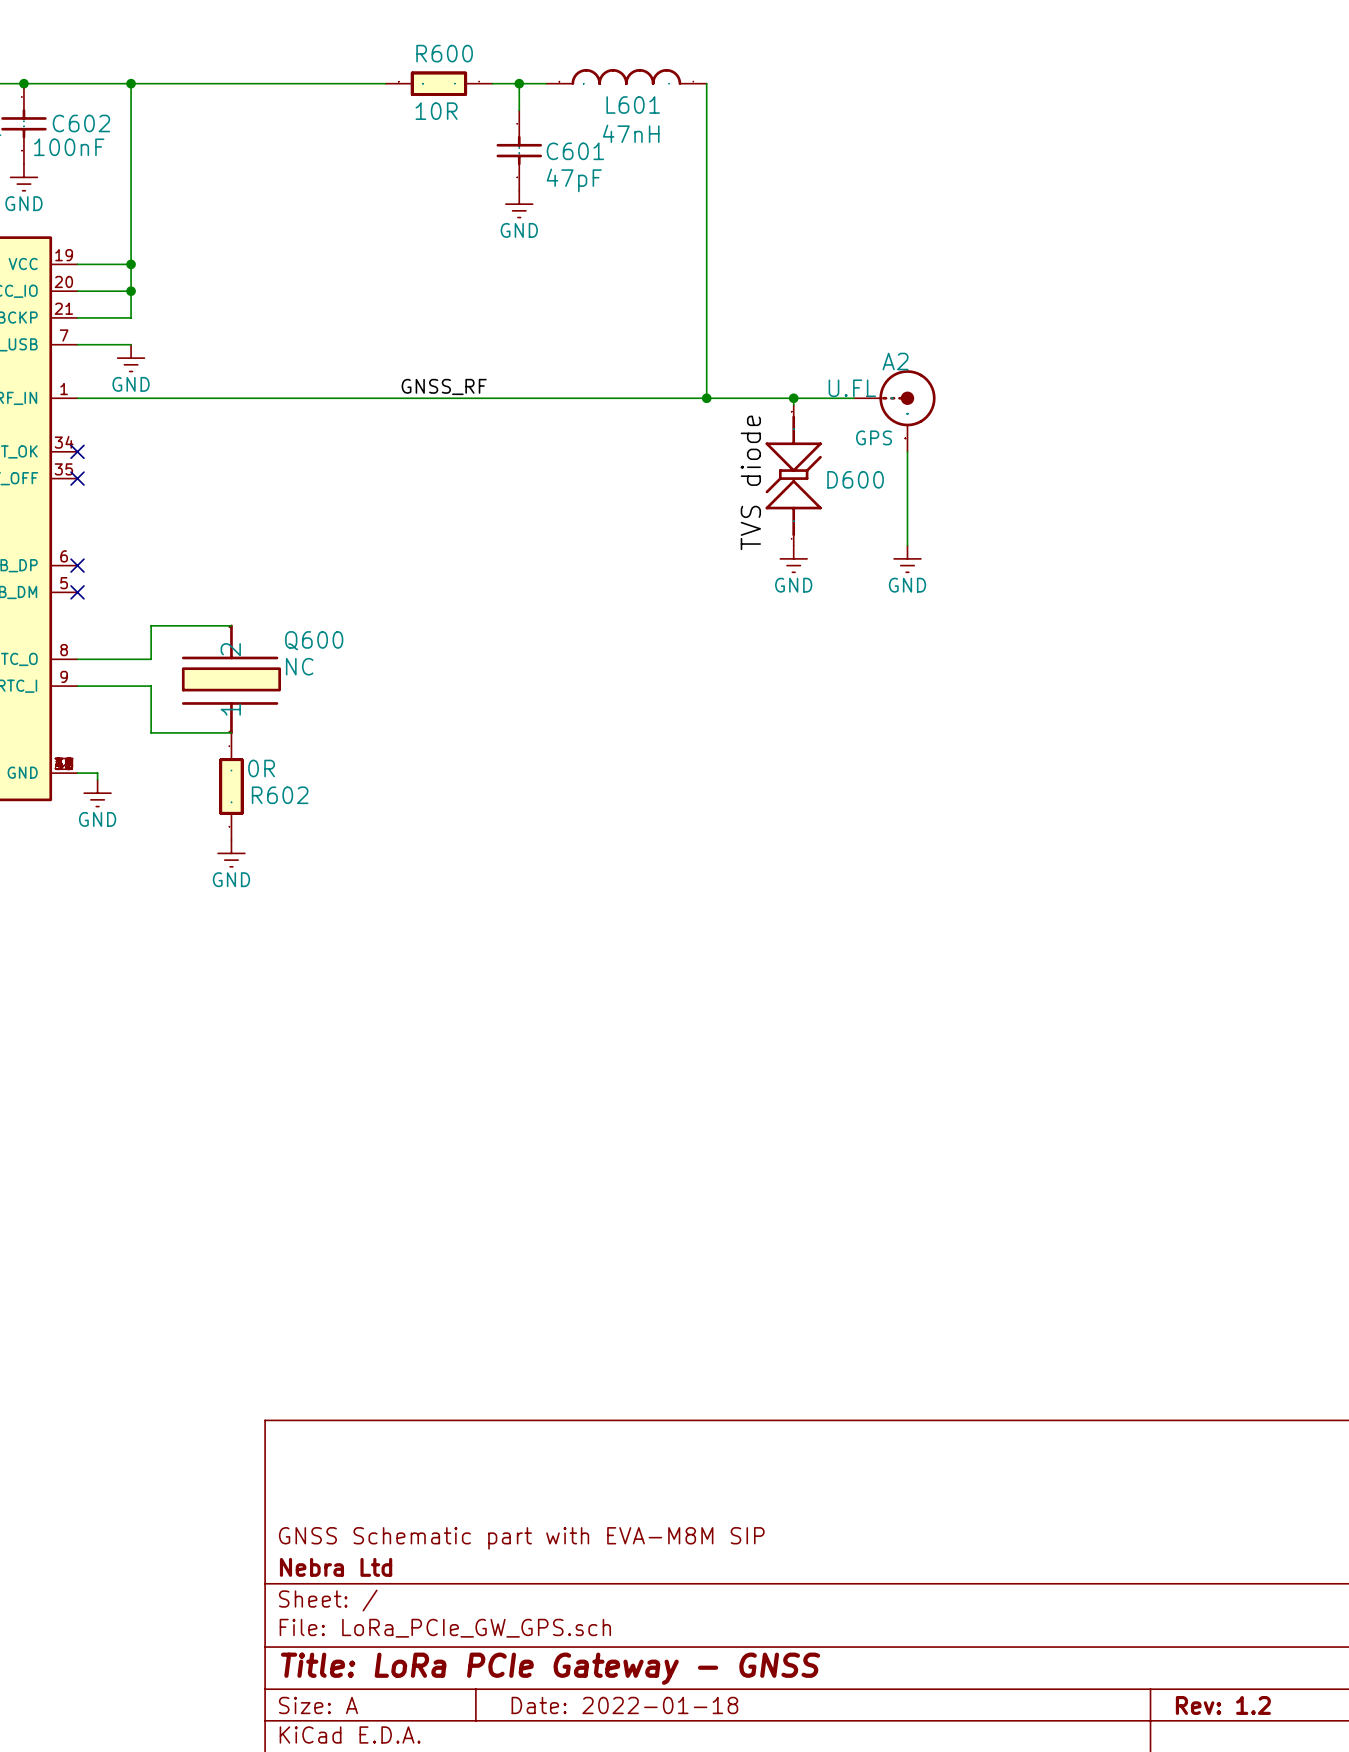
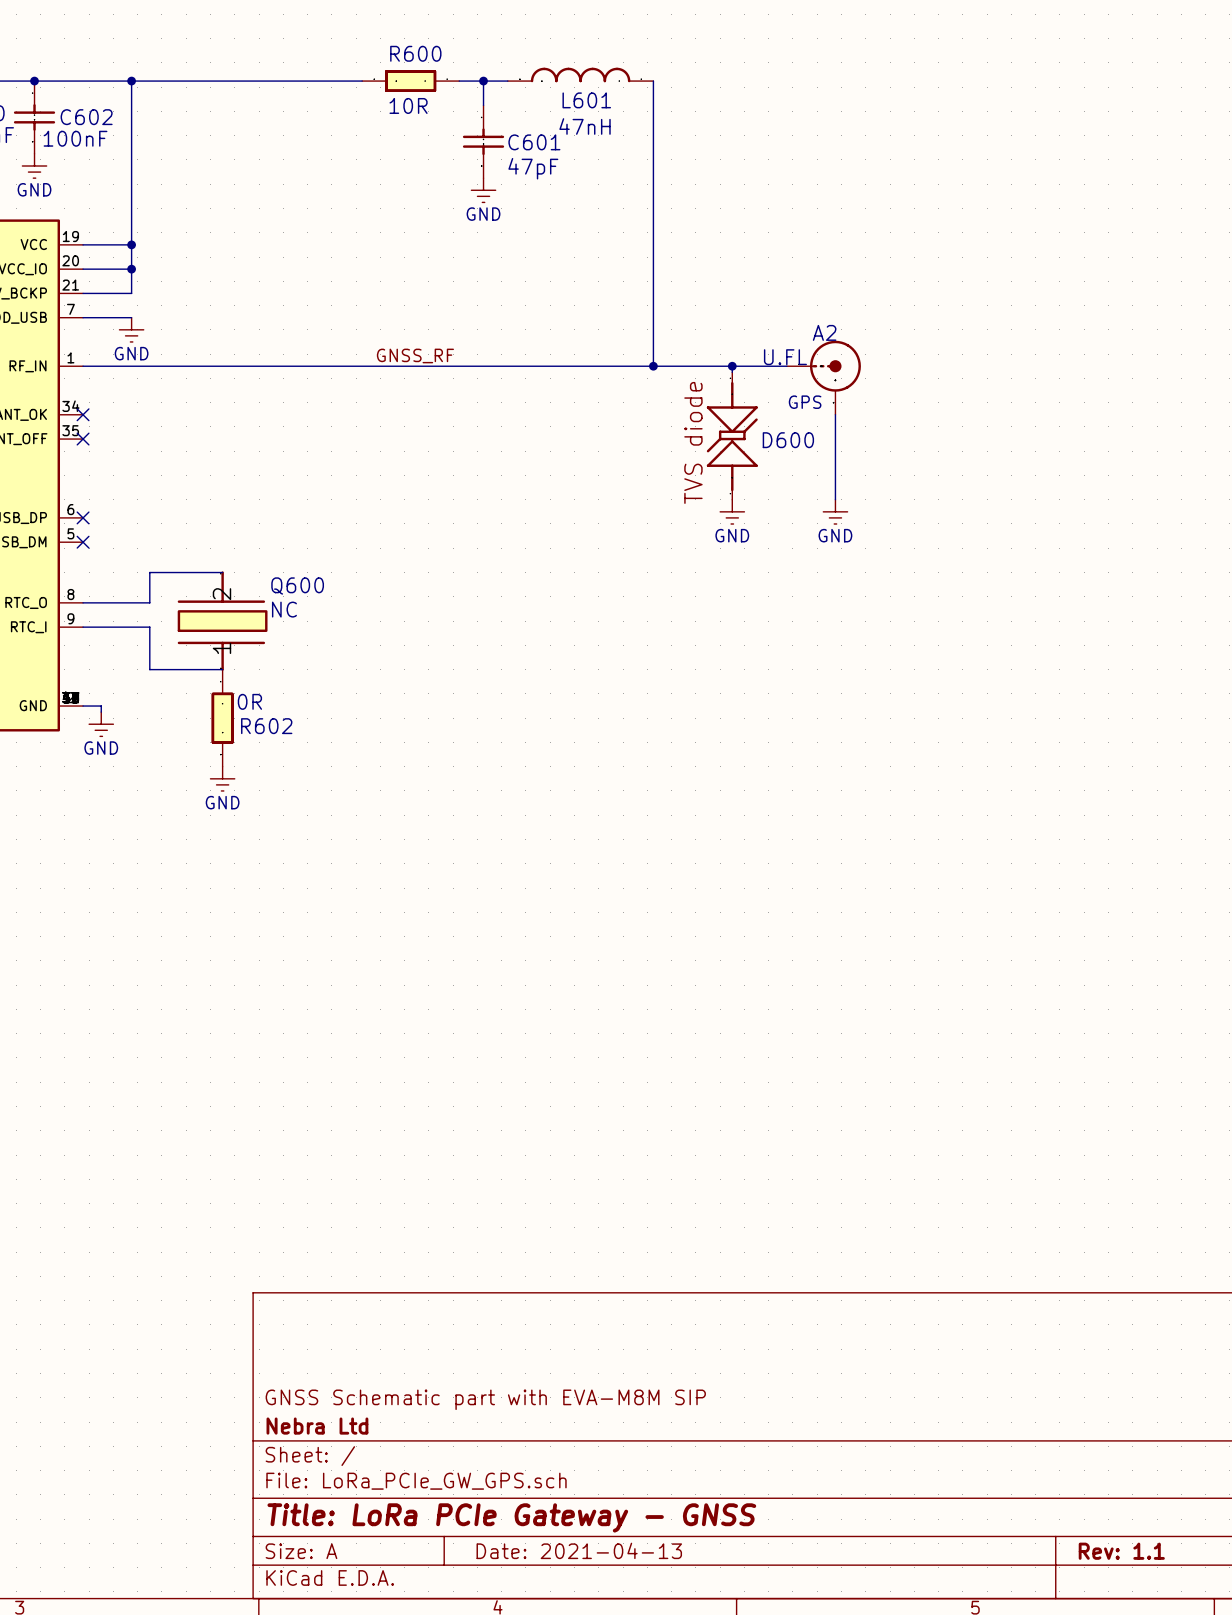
title block: Date: 2022-01-18 (624, 1705) -> Date: 2021-04-13 (579, 1550)
title block: Rev: 1.2 (1223, 1705) -> Rev: 1.1 (1121, 1551)

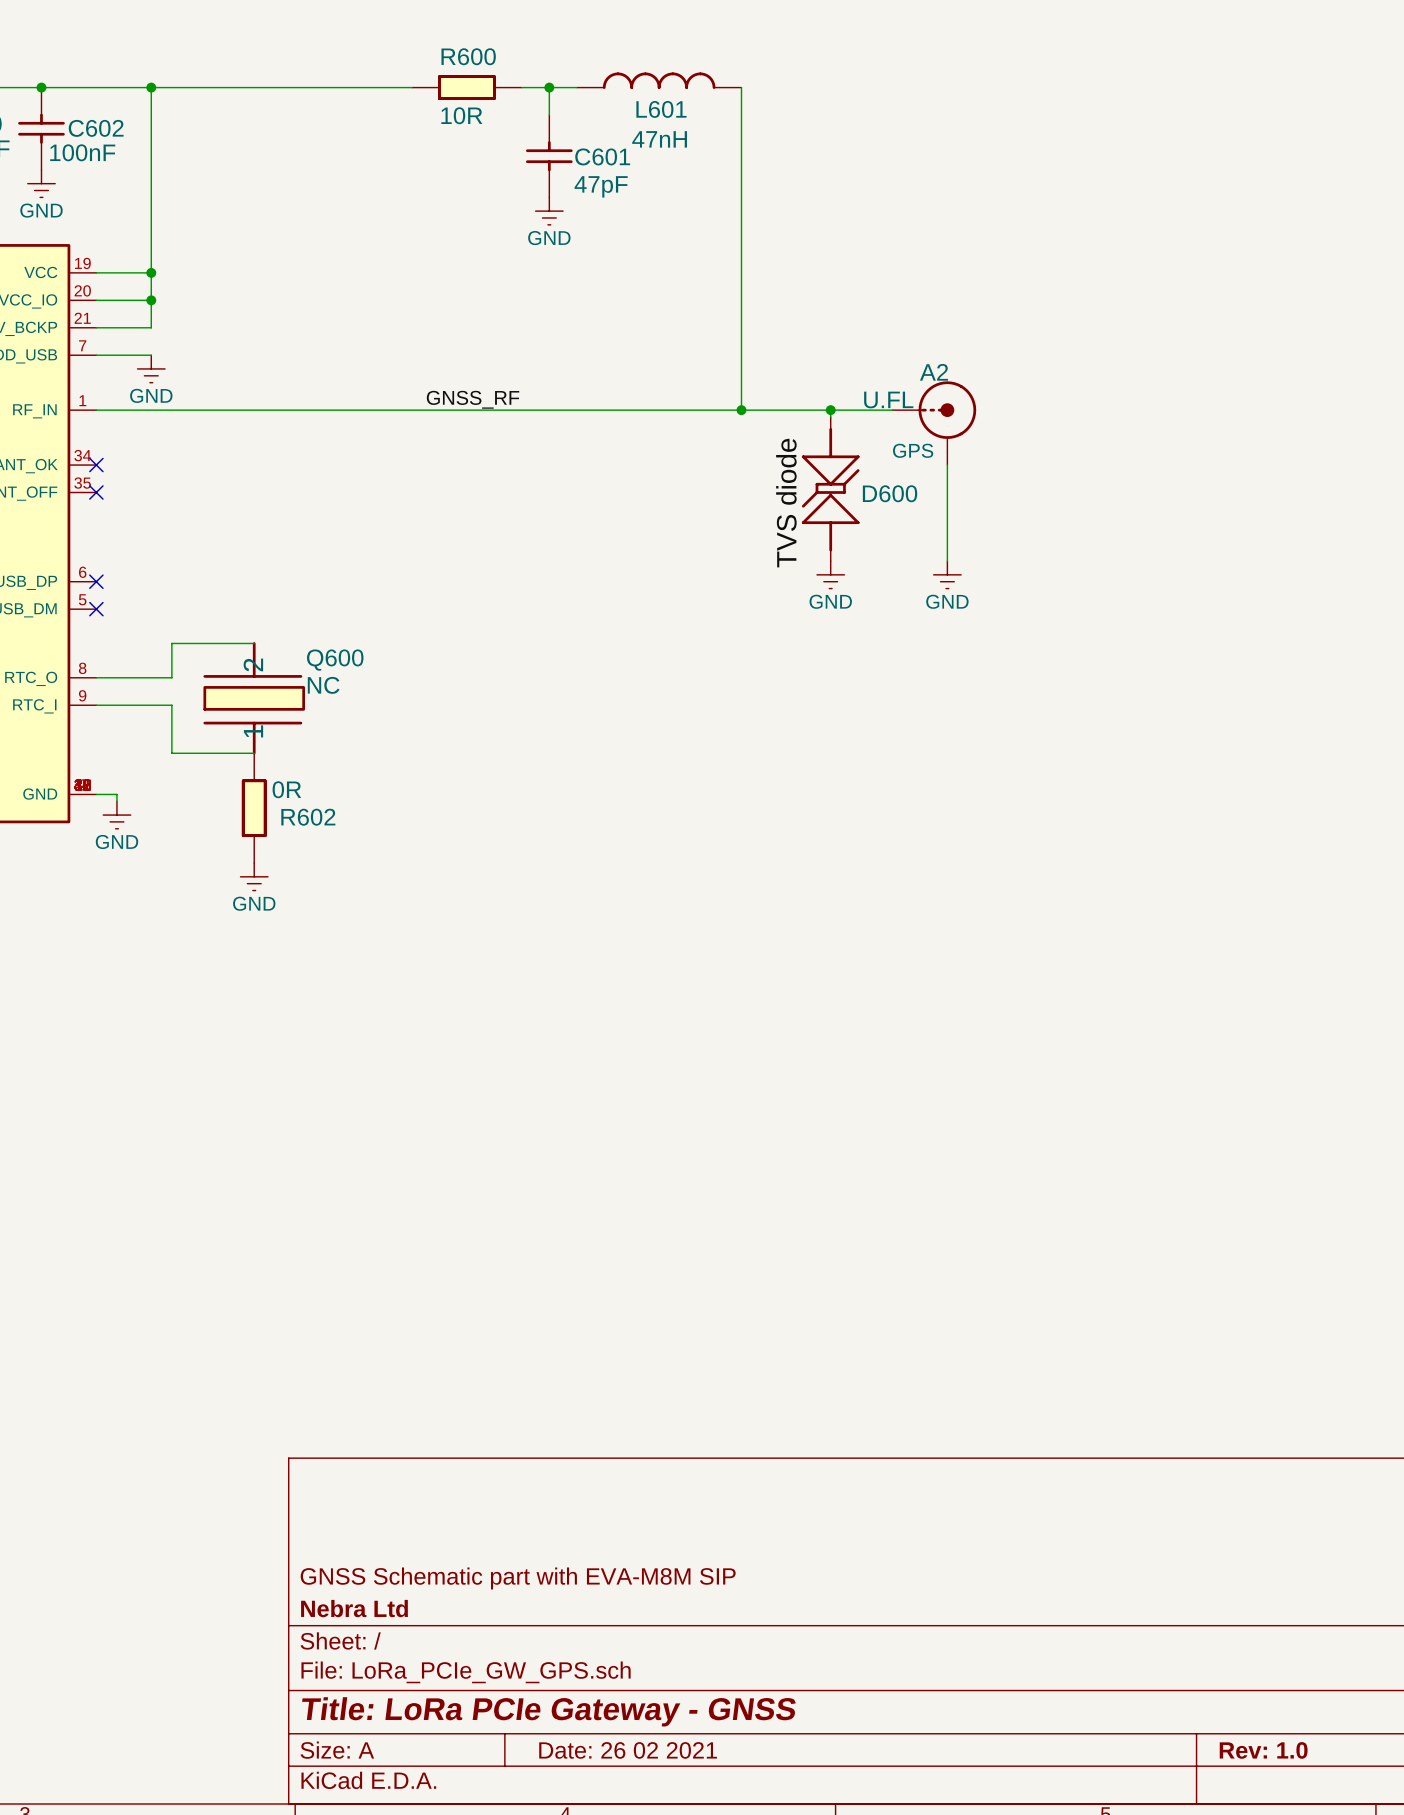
title block: Date: 2021-04-13 (579, 1550) -> Date: 26 02 2021 (628, 1750)
title block: Rev: 1.1 (1121, 1551) -> Rev: 1.0 (1263, 1750)

